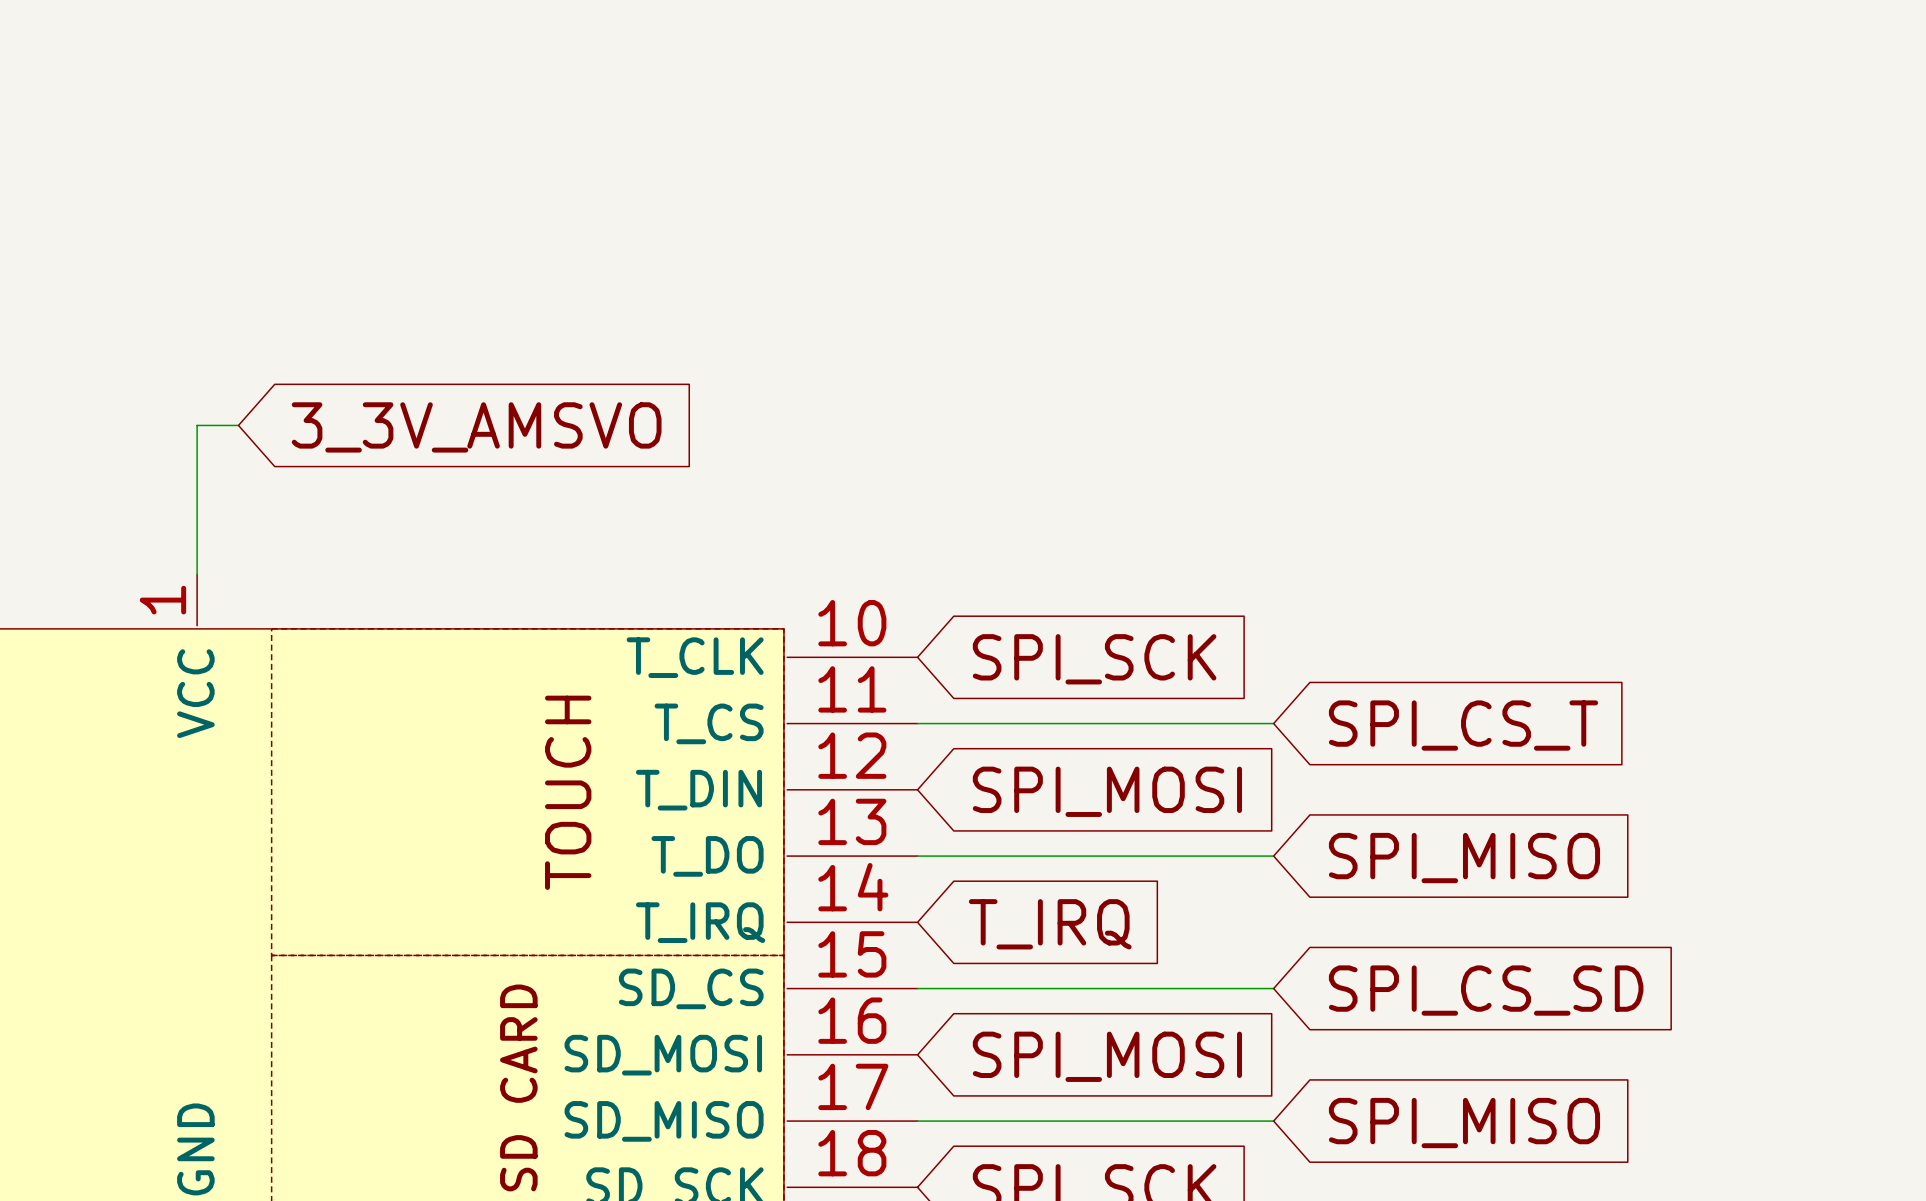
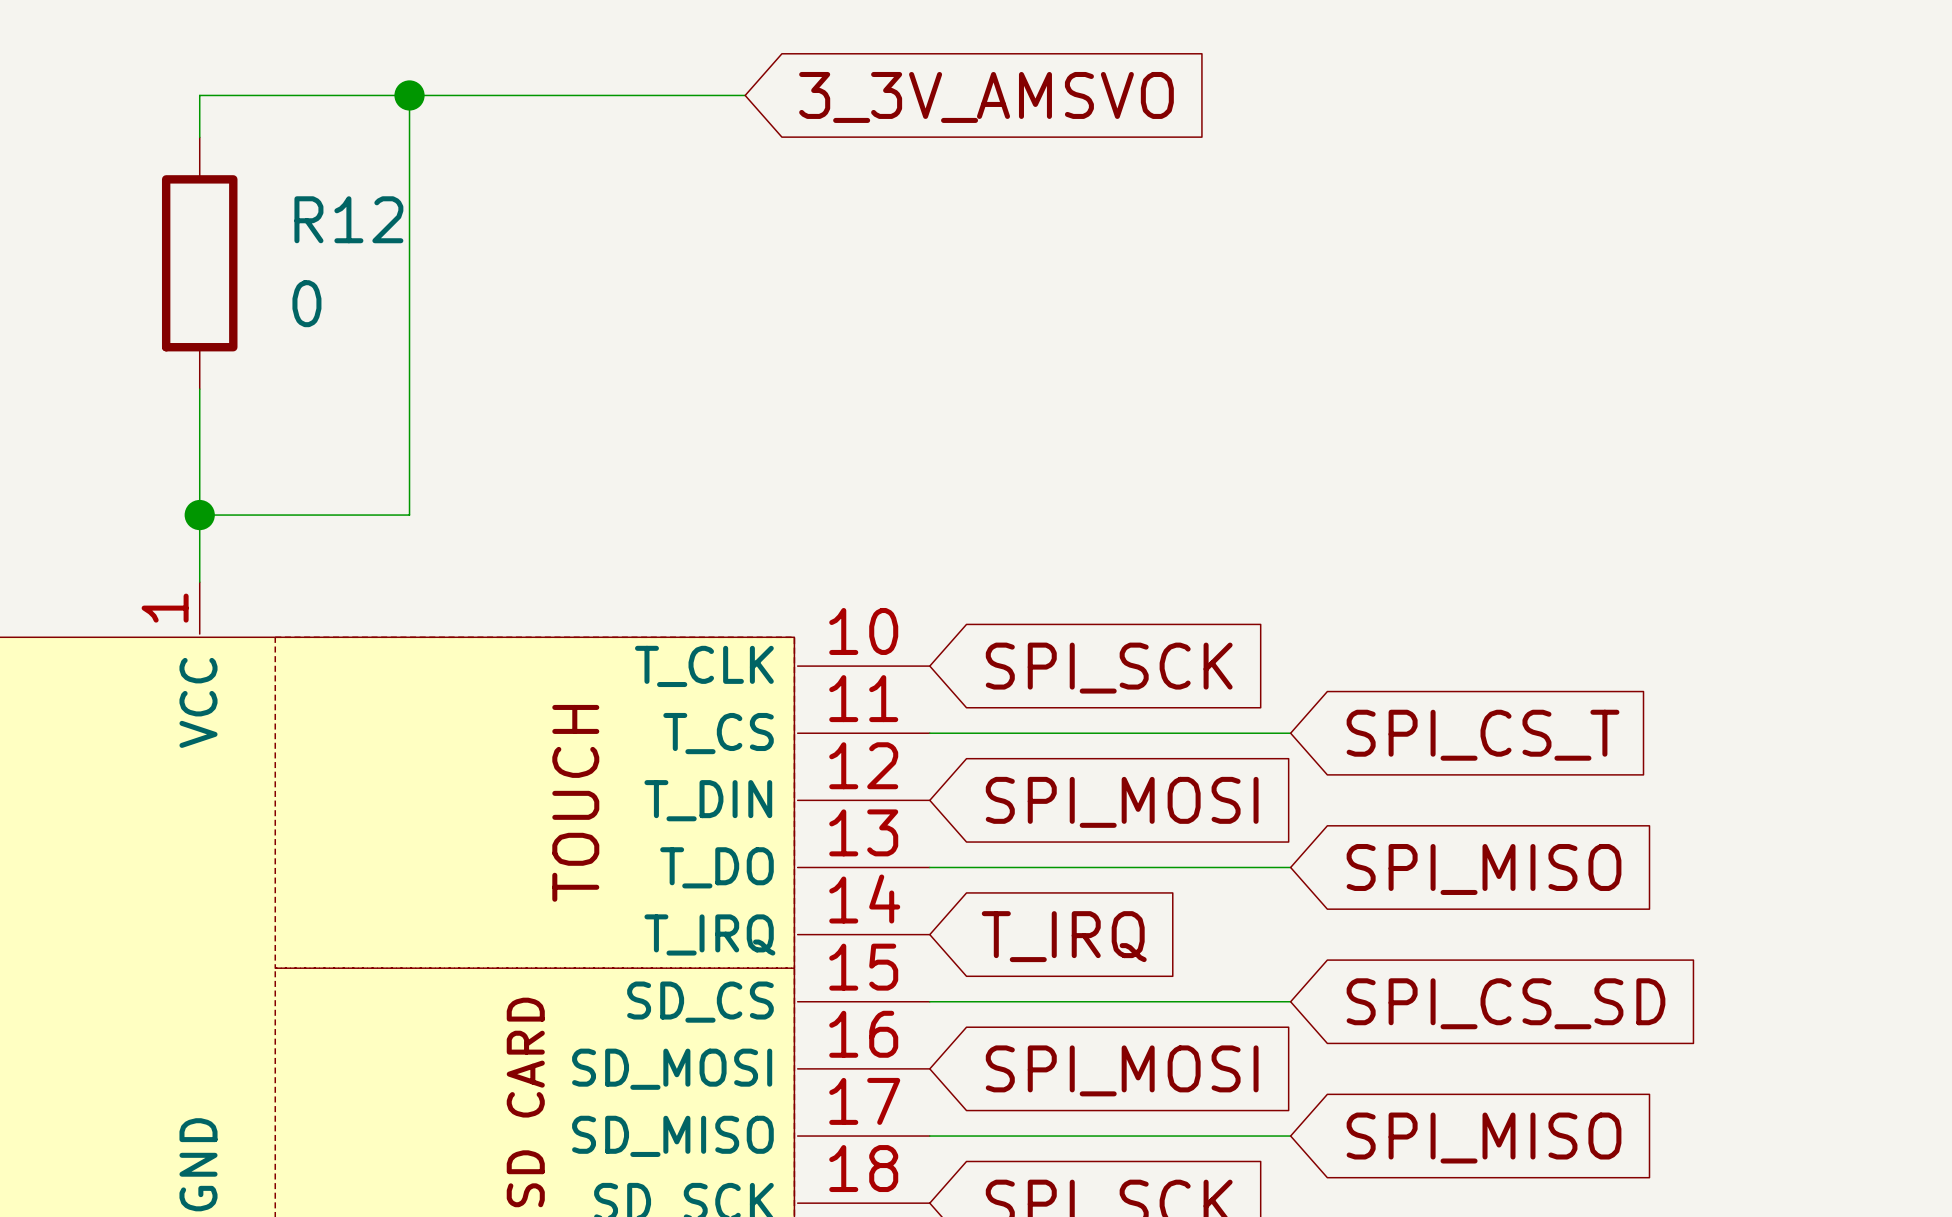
wire: none -> (409, 95) (409, 515) (199, 515)
junction: none -> (409, 95)
wire: none -> (745, 95) (199, 95) (199, 137)
R12: none -> 0 (199, 263)
wire: (197, 425) (238, 425) -> (199, 431) (199, 389)
global label position: 3_3V_AMSVO (476, 427) -> 3_3V_AMSVO (986, 97)
junction: none -> (199, 515)

